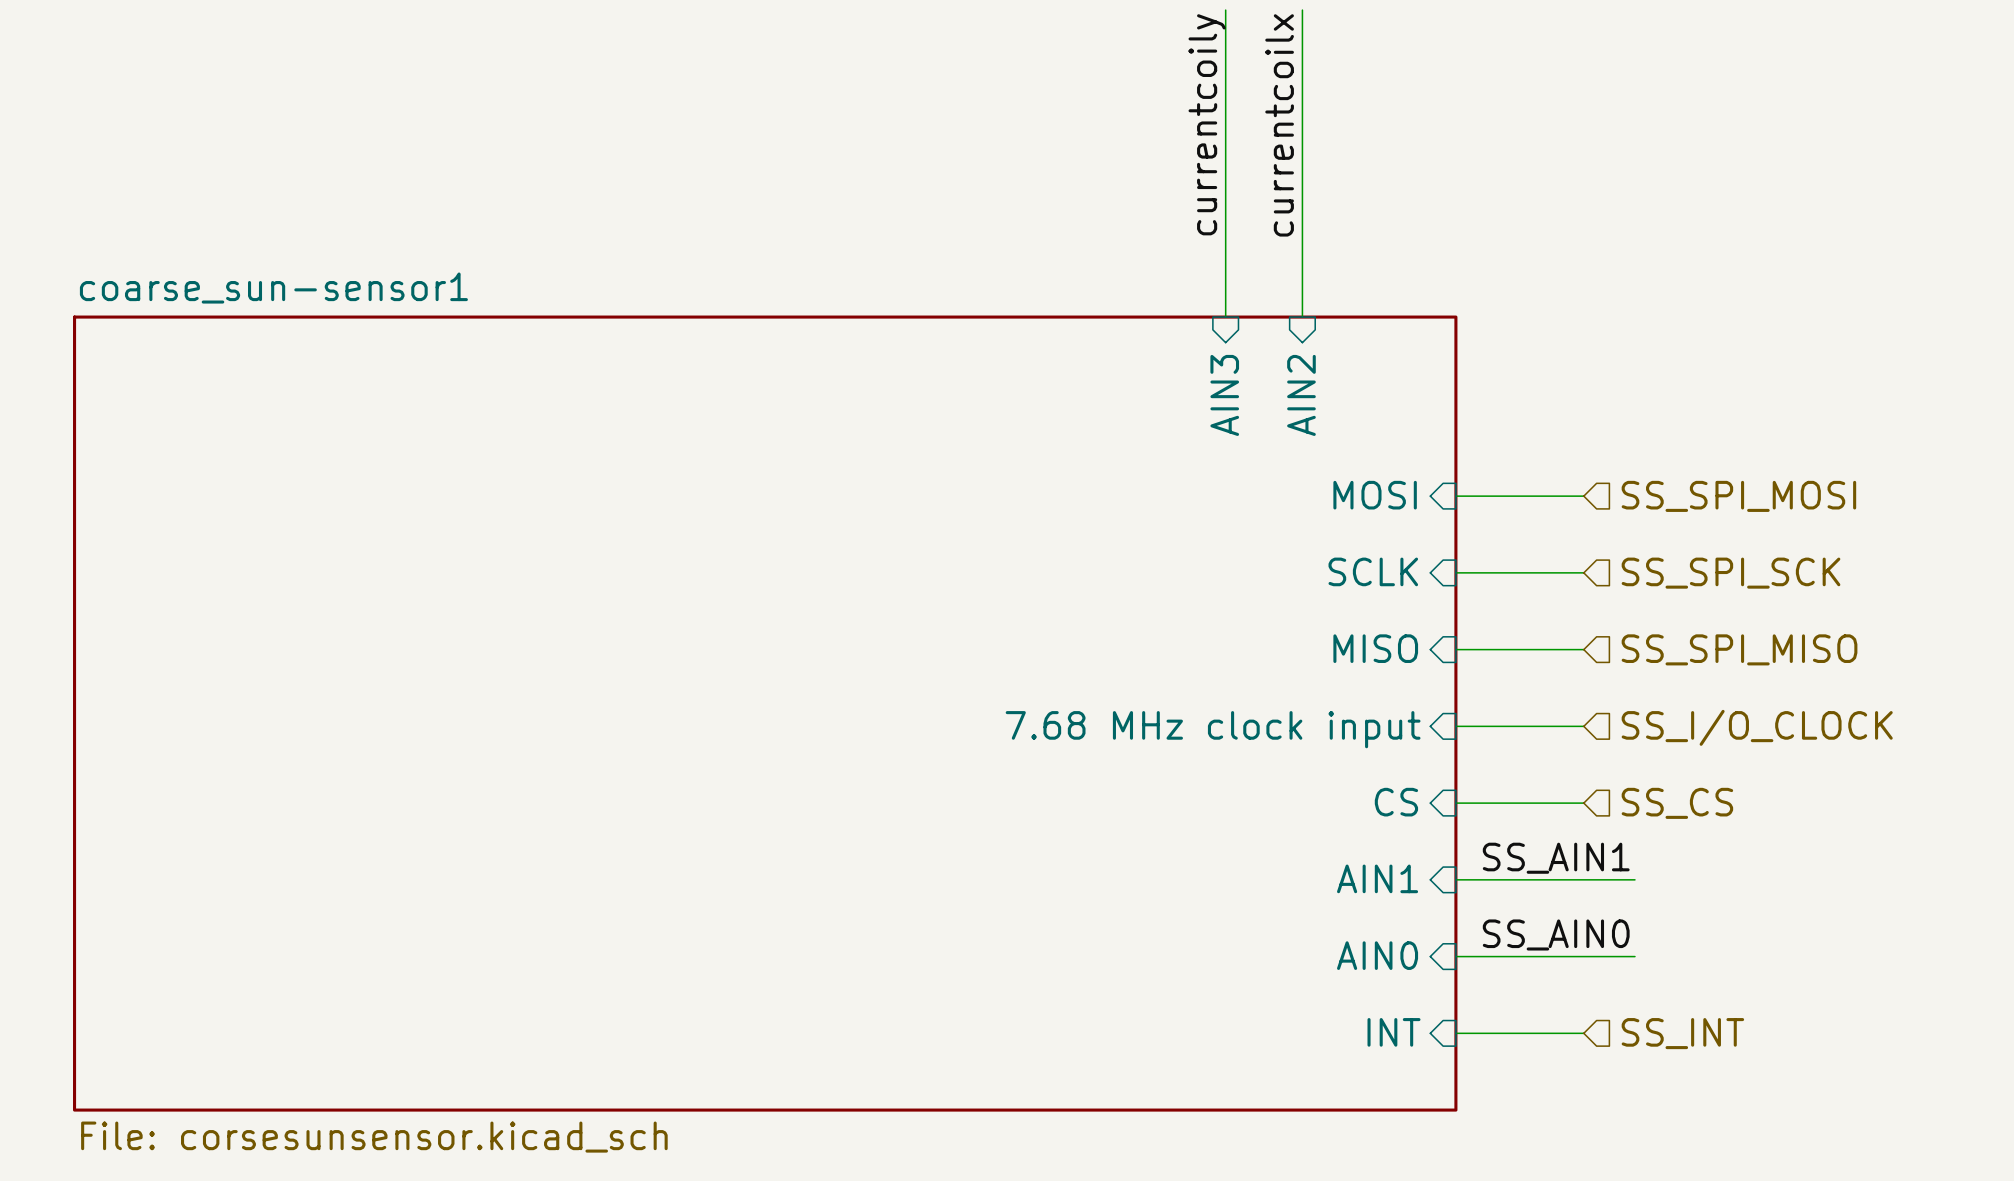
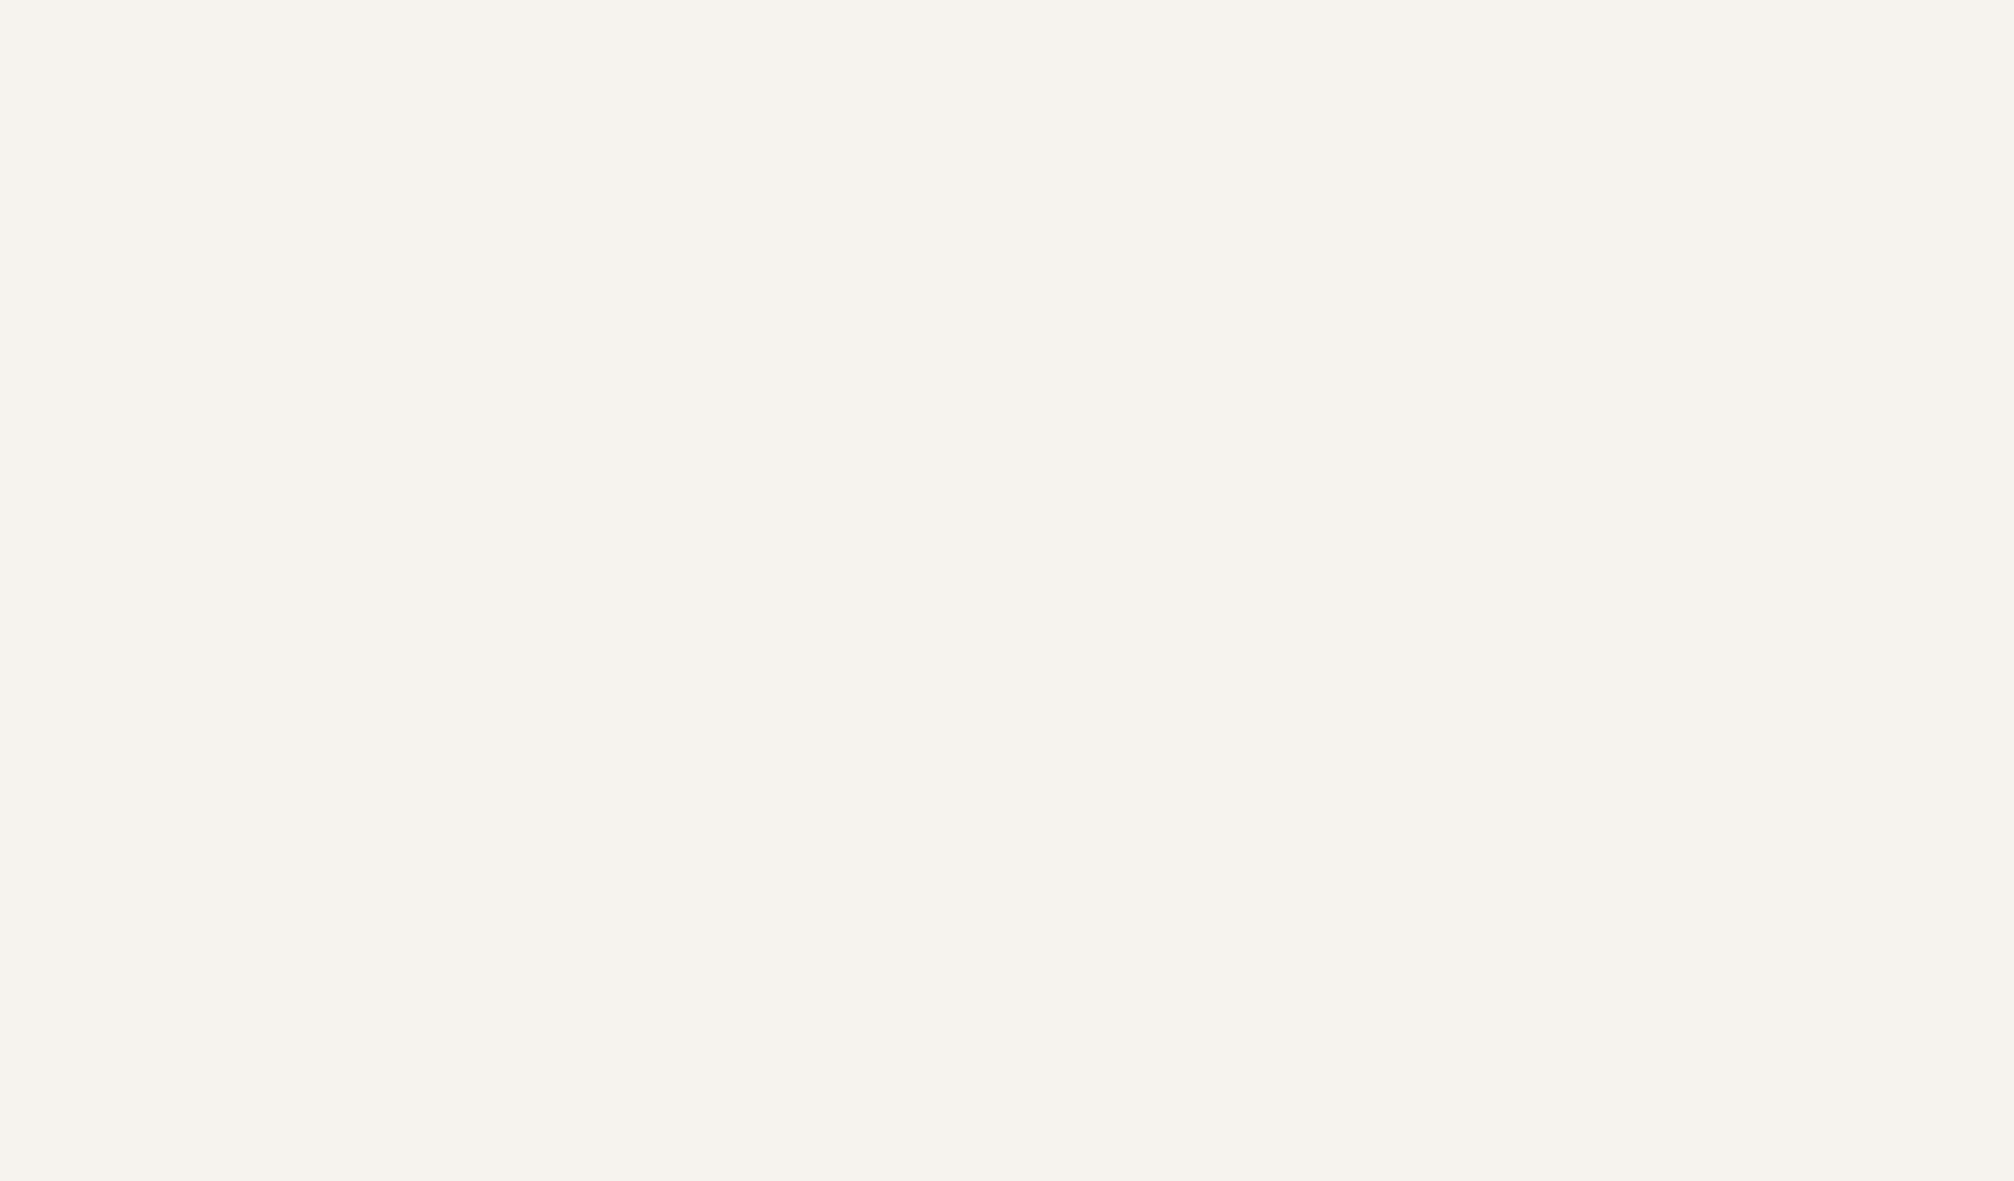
wire: (1225, 10) (1225, 317) -> none
wire: (1302, 10) (1302, 317) -> none
label: currentcoily (1207, 124) -> none
label: currentcoilx (1279, 125) -> none
sheet pin: AIN3 (1224, 395) -> none
sheet pin: AIN2 (1301, 395) -> none
sheet pin: MOSI (1375, 495) -> none
wire: (1455, 496) (1583, 496) -> none
hierarchical label: SS_SPI_MOSI (1738, 496) -> none
sheet pin: SCLK (1373, 571) -> none
wire: (1455, 572) (1583, 572) -> none
hierarchical label: SS_SPI_SCK (1731, 573) -> none
sheet pin: MISO (1375, 648) -> none
wire: (1455, 649) (1583, 649) -> none
hierarchical label: SS_SPI_MISO (1739, 649) -> none
sheet coarse_sun-sensor1: File: corsesunsensor.kicad_sch (765, 713) -> none
wire: (1455, 726) (1583, 726) -> none
hierarchical label: SS_I/O_CLOCK (1757, 727) -> none
sheet pin: 7.68 MHz clock input (1213, 729) -> none
sheet pin: CS (1396, 802) -> none
wire: (1455, 803) (1583, 803) -> none
hierarchical label: SS_CS (1677, 803) -> none
label: SS_AIN1 (1556, 858) -> none
sheet pin: AIN1 (1377, 878) -> none
wire: (1455, 879) (1634, 879) -> none
label: SS_AIN0 (1556, 934) -> none
sheet pin: AIN0 (1377, 955) -> none
wire: (1455, 956) (1634, 956) -> none
sheet pin: INT (1393, 1032) -> none
wire: (1455, 1033) (1583, 1033) -> none
hierarchical label: SS_INT (1682, 1033) -> none

